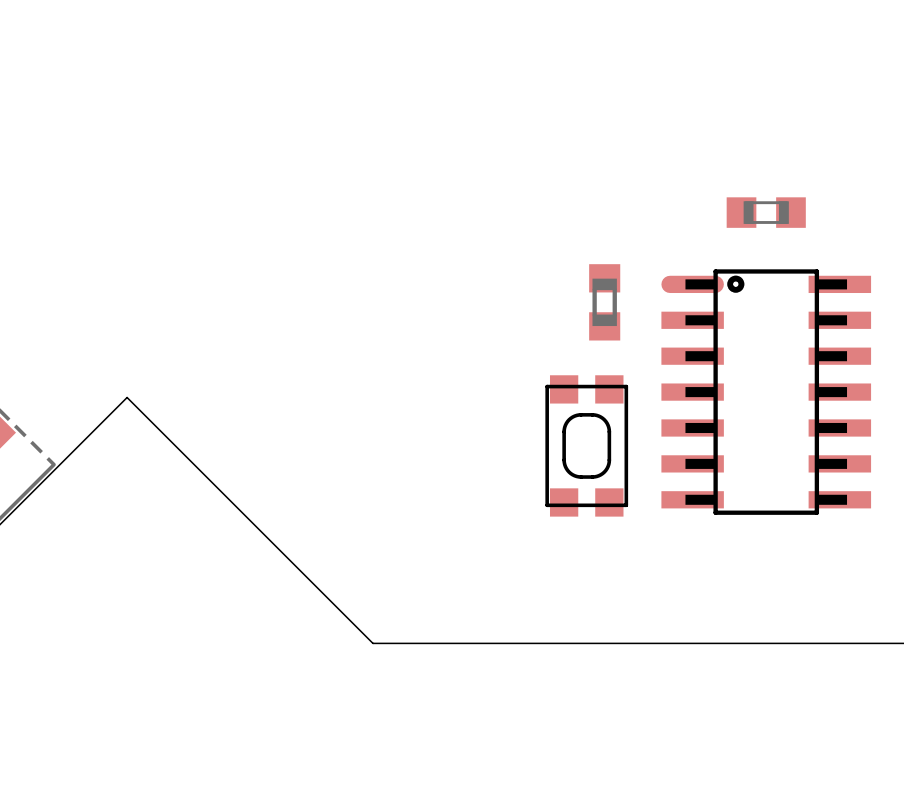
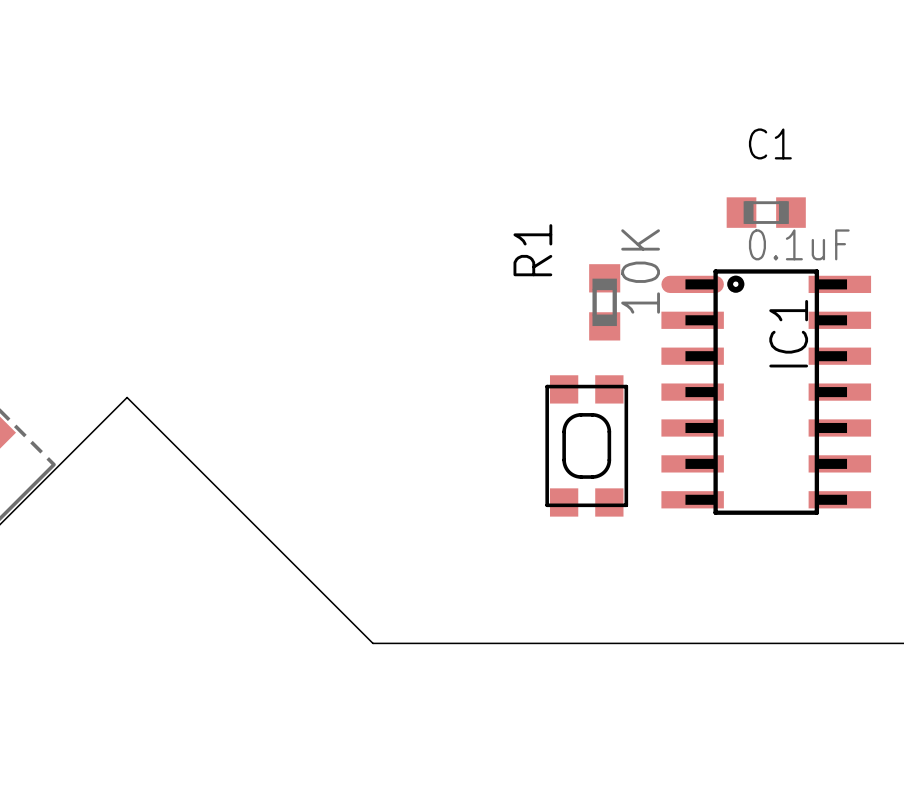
C1 name: none -> C1 (770, 143)
C1 value: none -> 0.1uF (799, 244)
R1 name: none -> R1 (532, 250)
R1 value: none -> 10K (640, 271)
IC1 name: none -> IC1 (788, 333)

